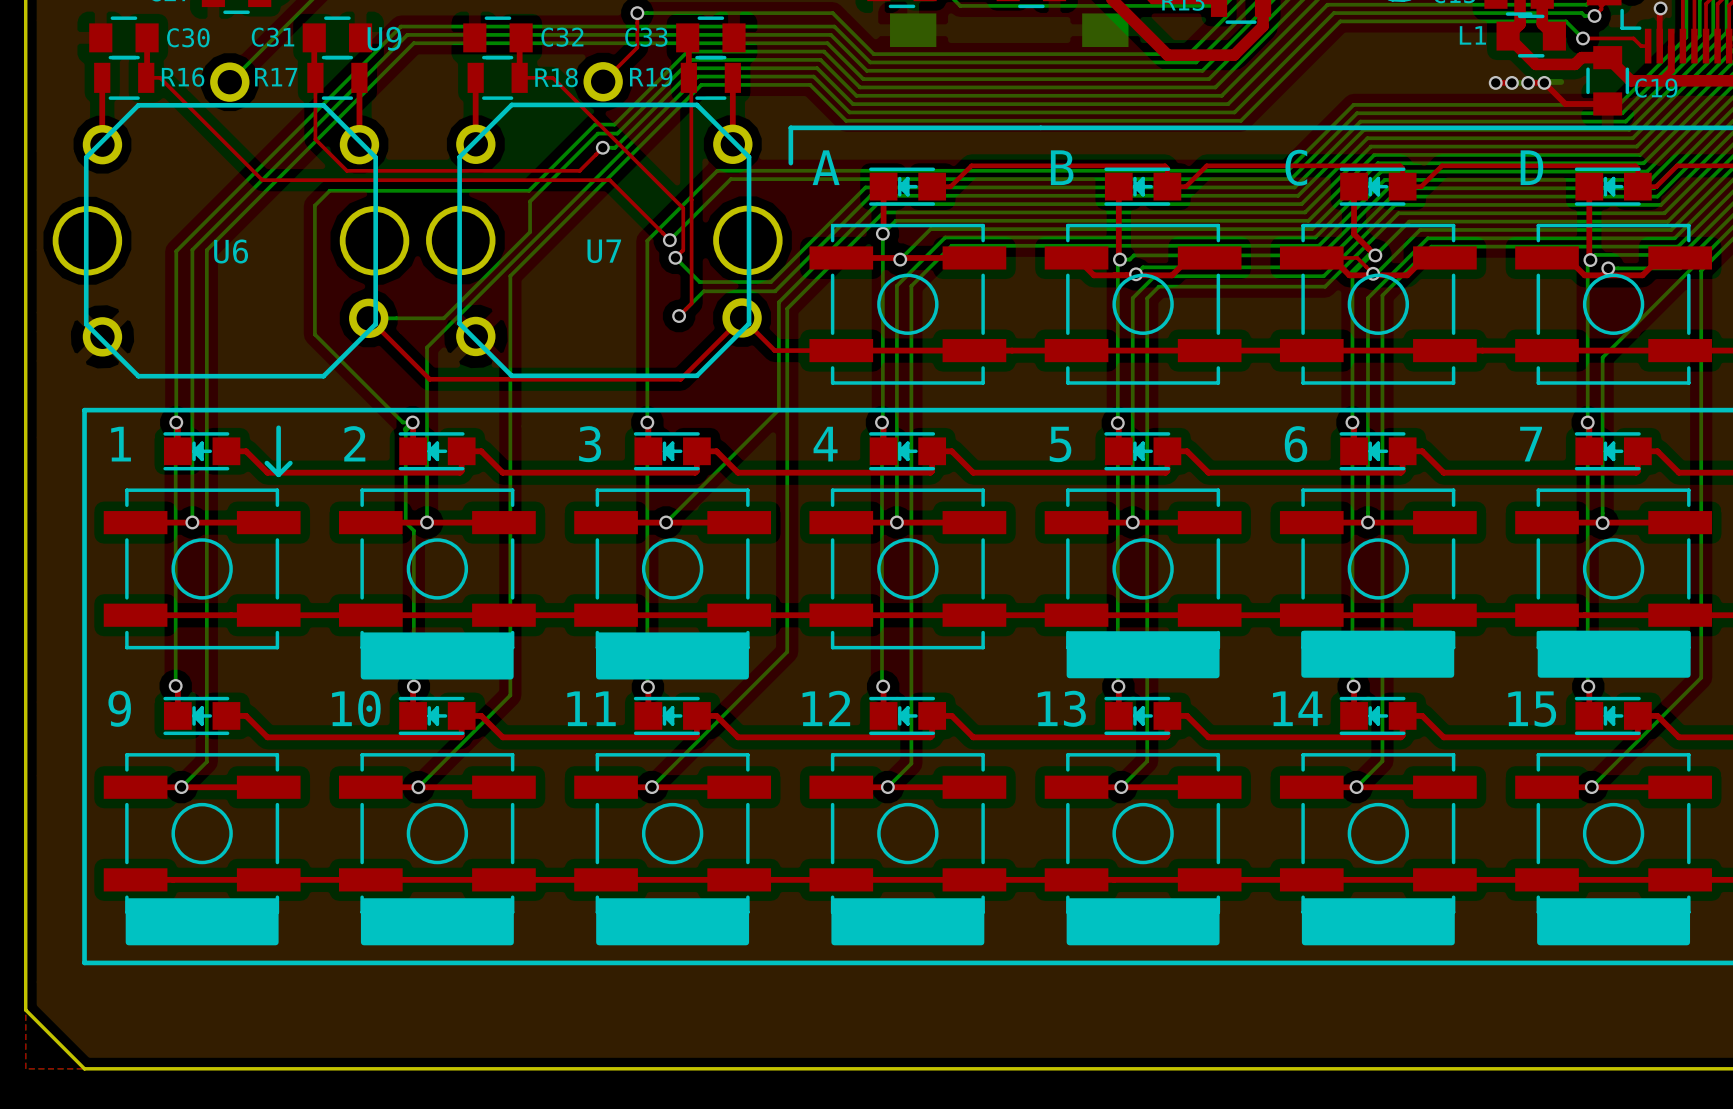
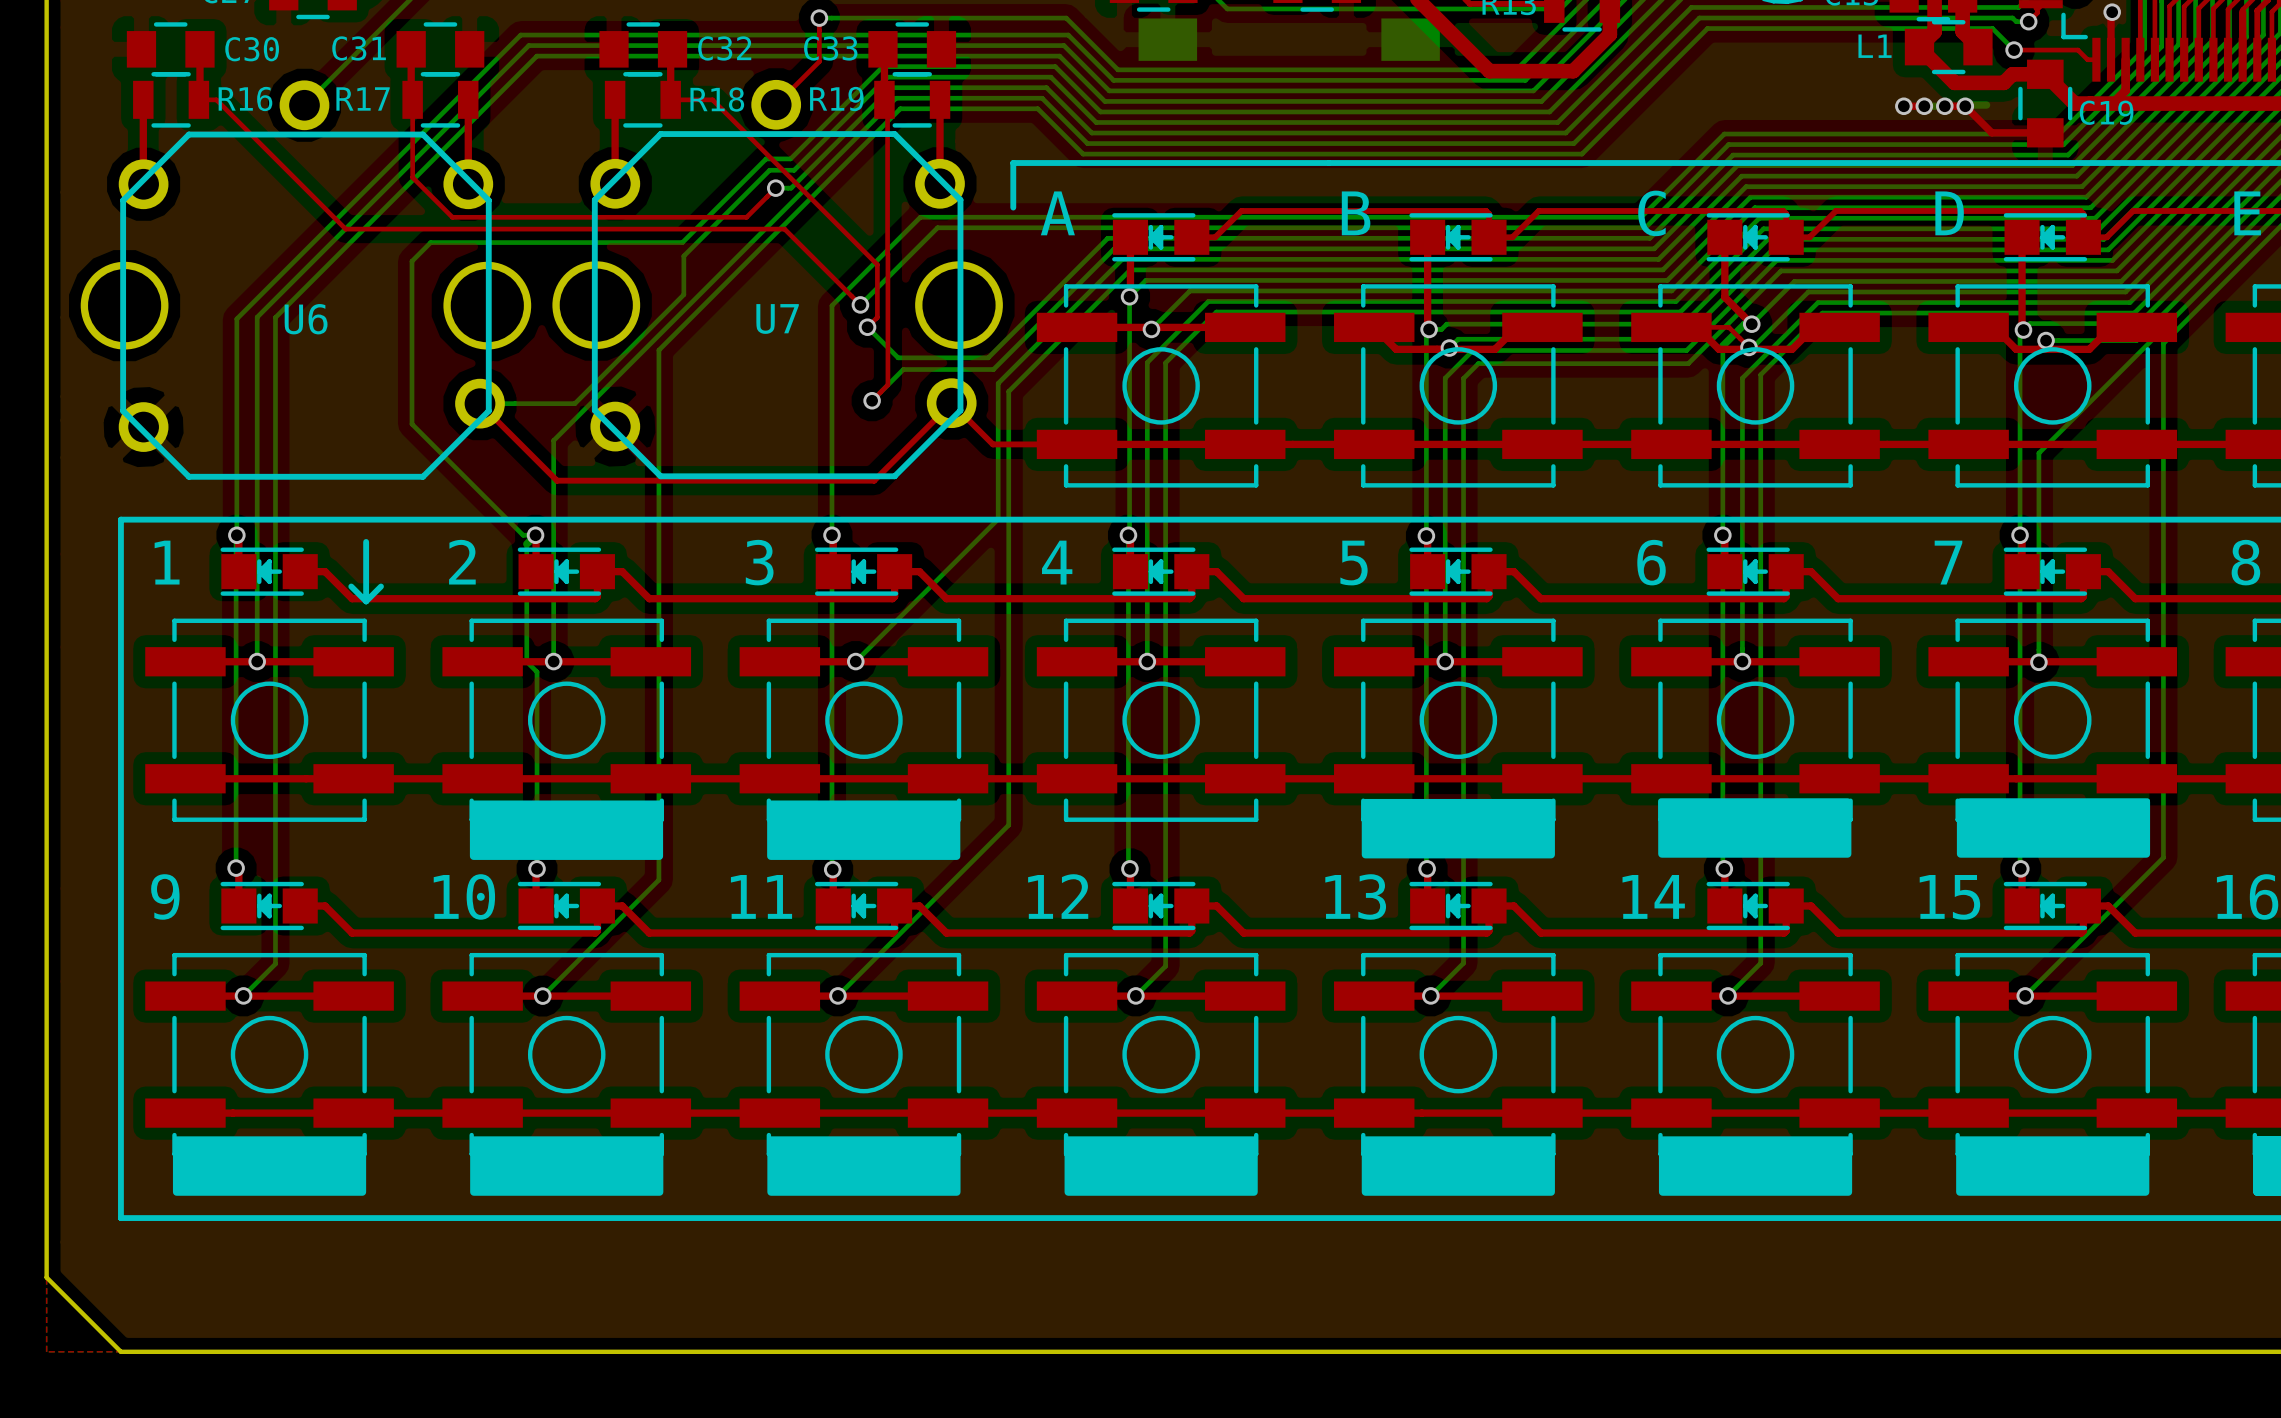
U9 name: U9 (384, 38) -> none

